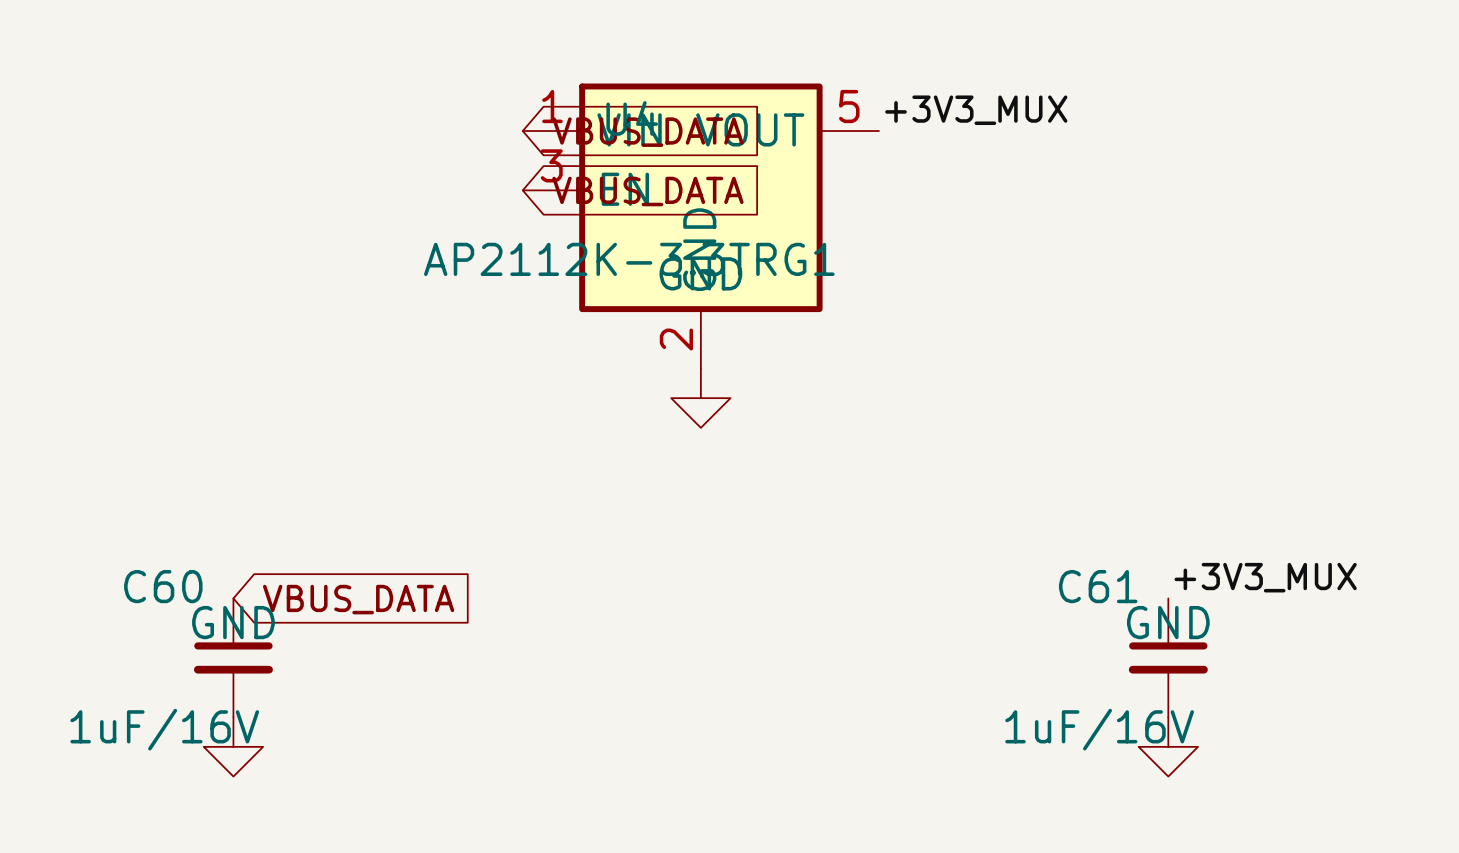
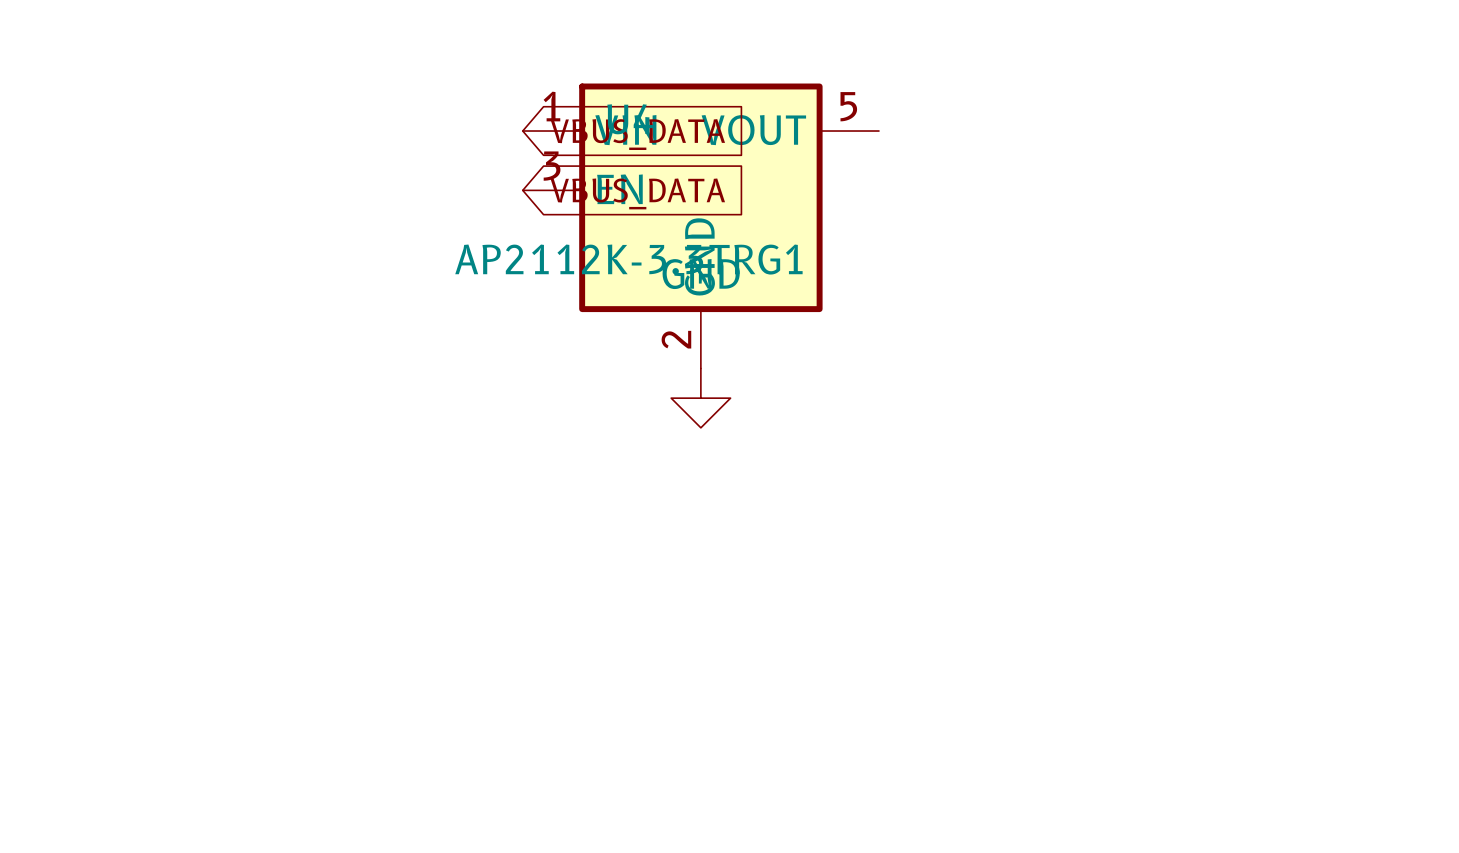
label: +3V3_MUX (976, 110) -> none
label: +3V3_MUX (1265, 577) -> none
global label: VBUS_DATA (358, 599) -> none
C60: 1uF/16V (233, 657) -> none
C61: 1uF/16V (1168, 657) -> none
power symbol: GND (233, 746) -> none
power symbol: GND (1168, 746) -> none

